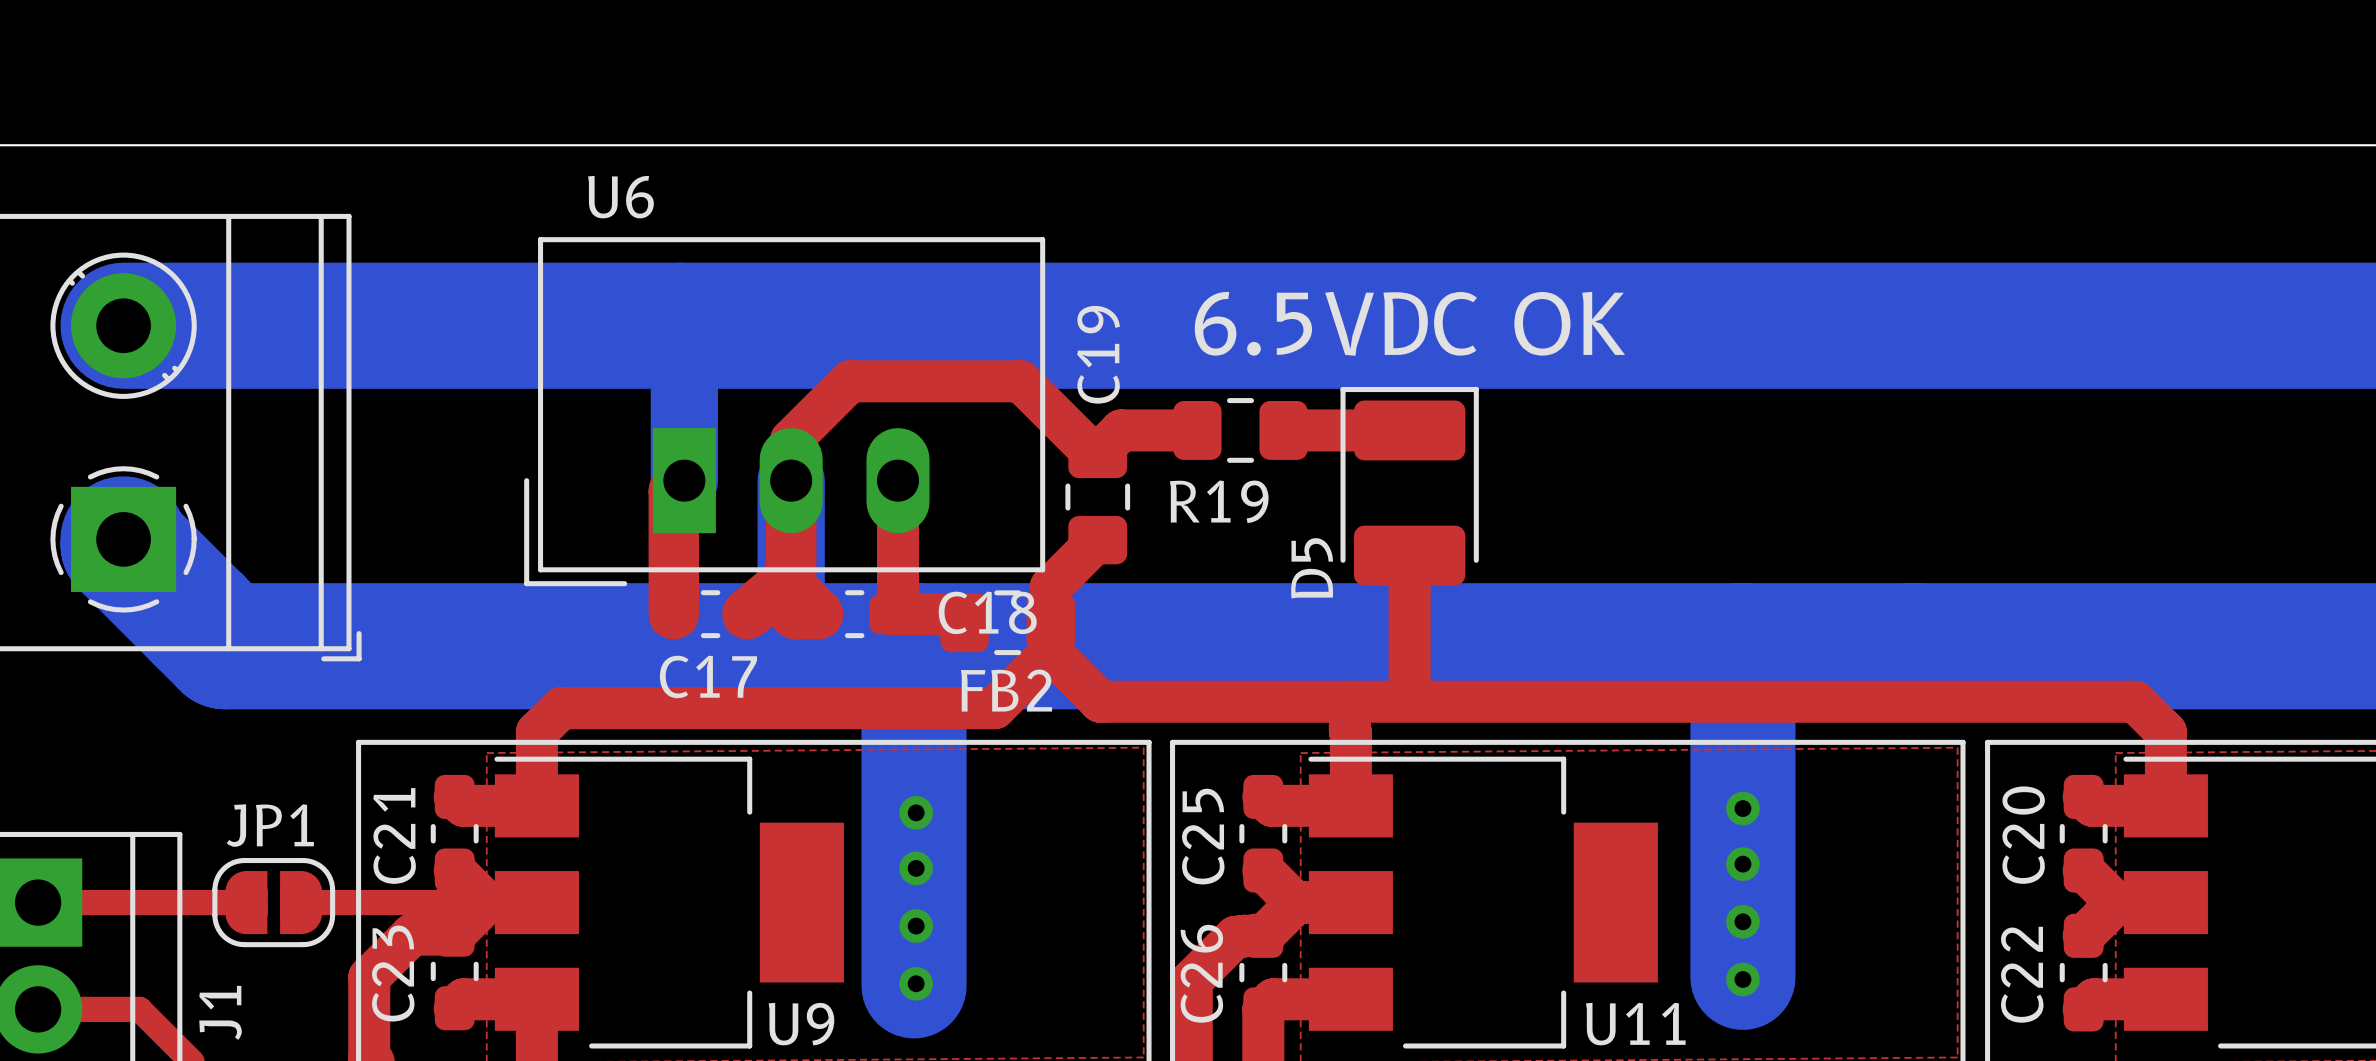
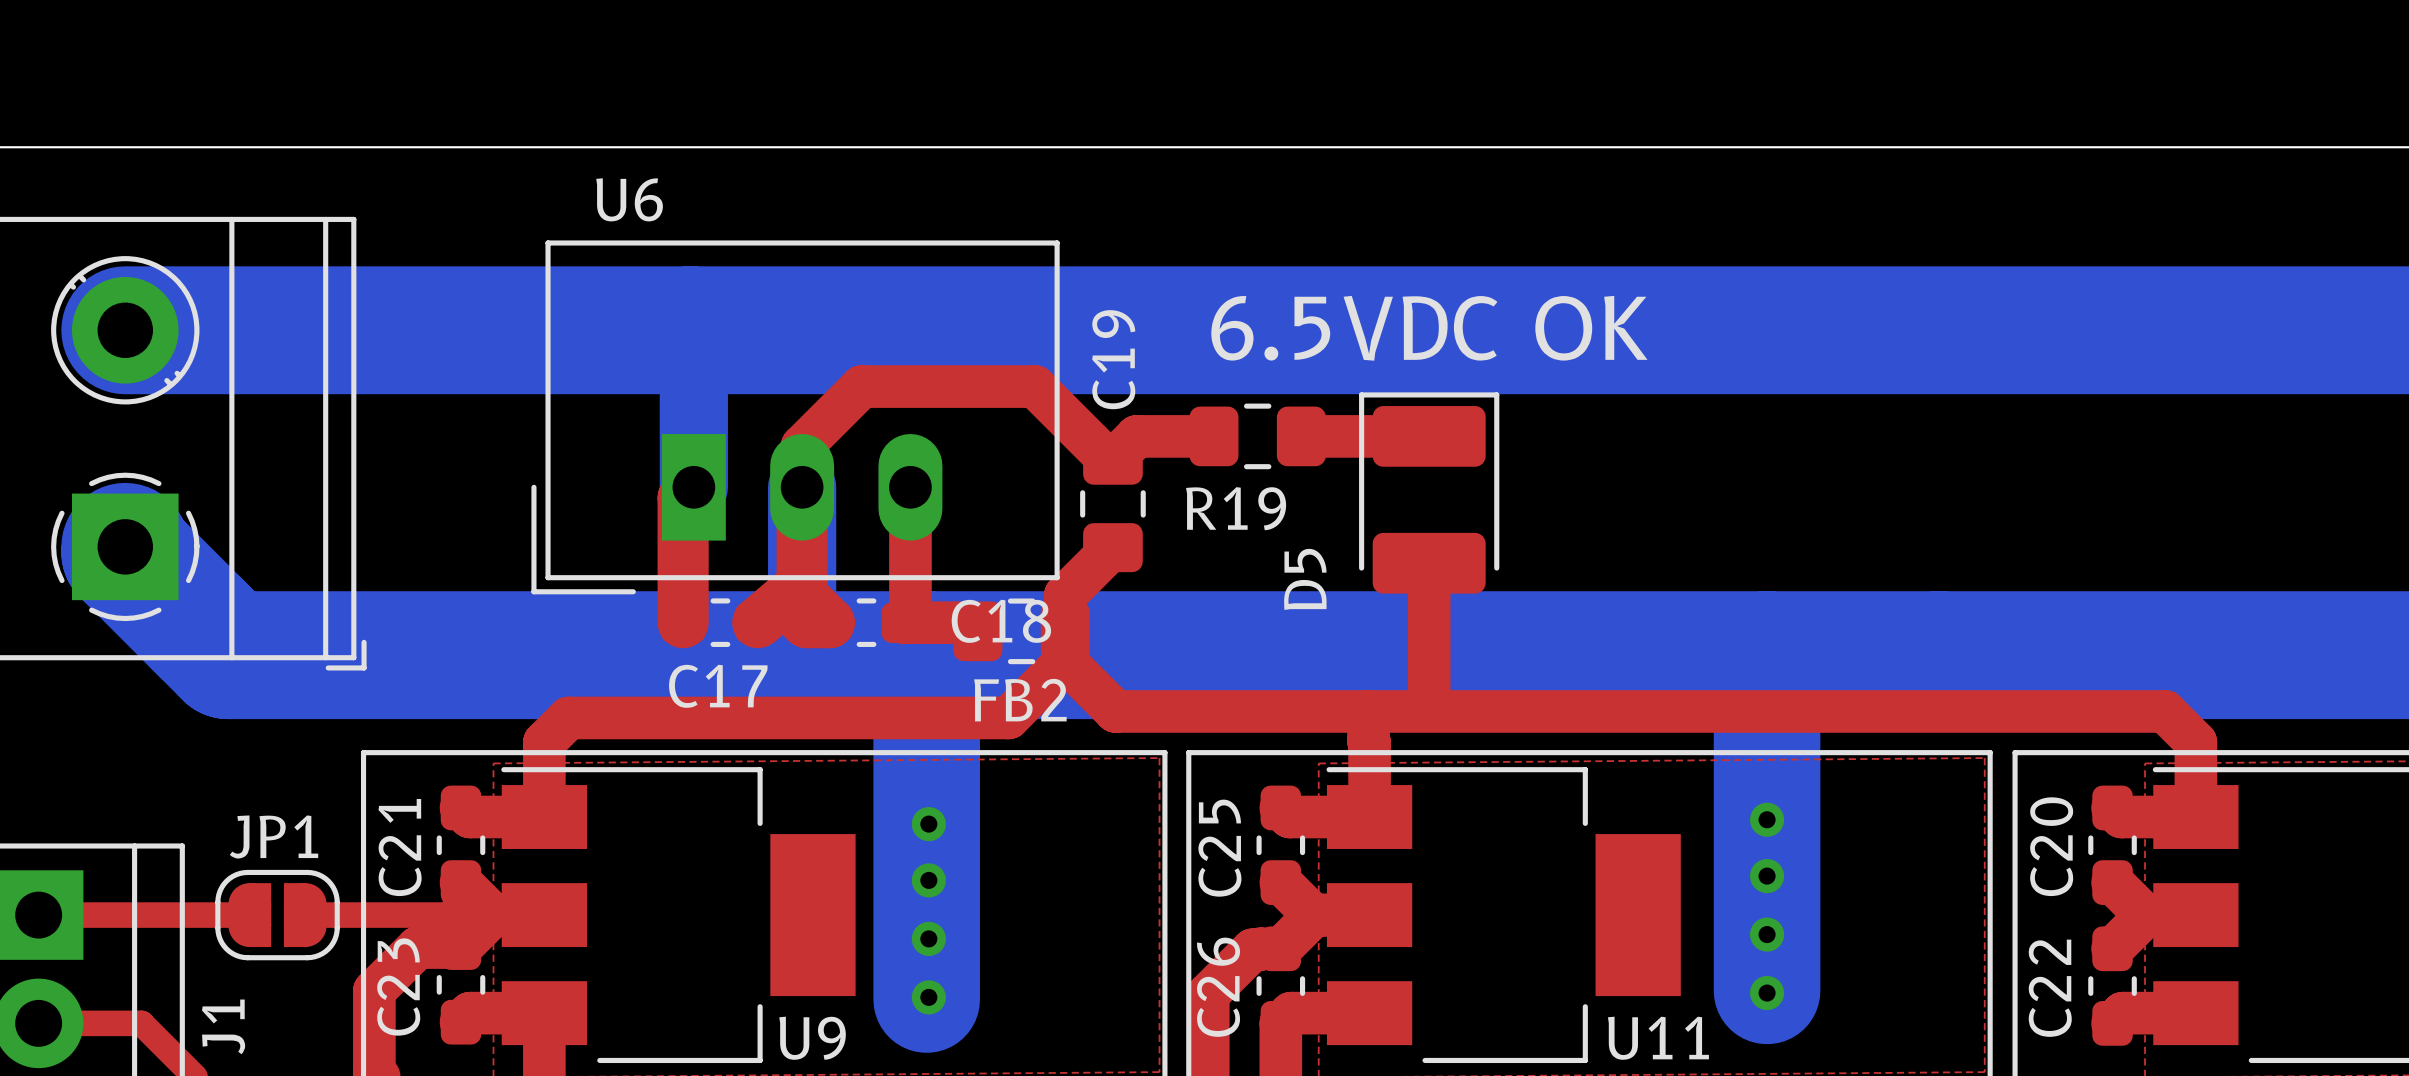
D5 name position: D5 (1312, 568) -> D5 (1305, 579)

